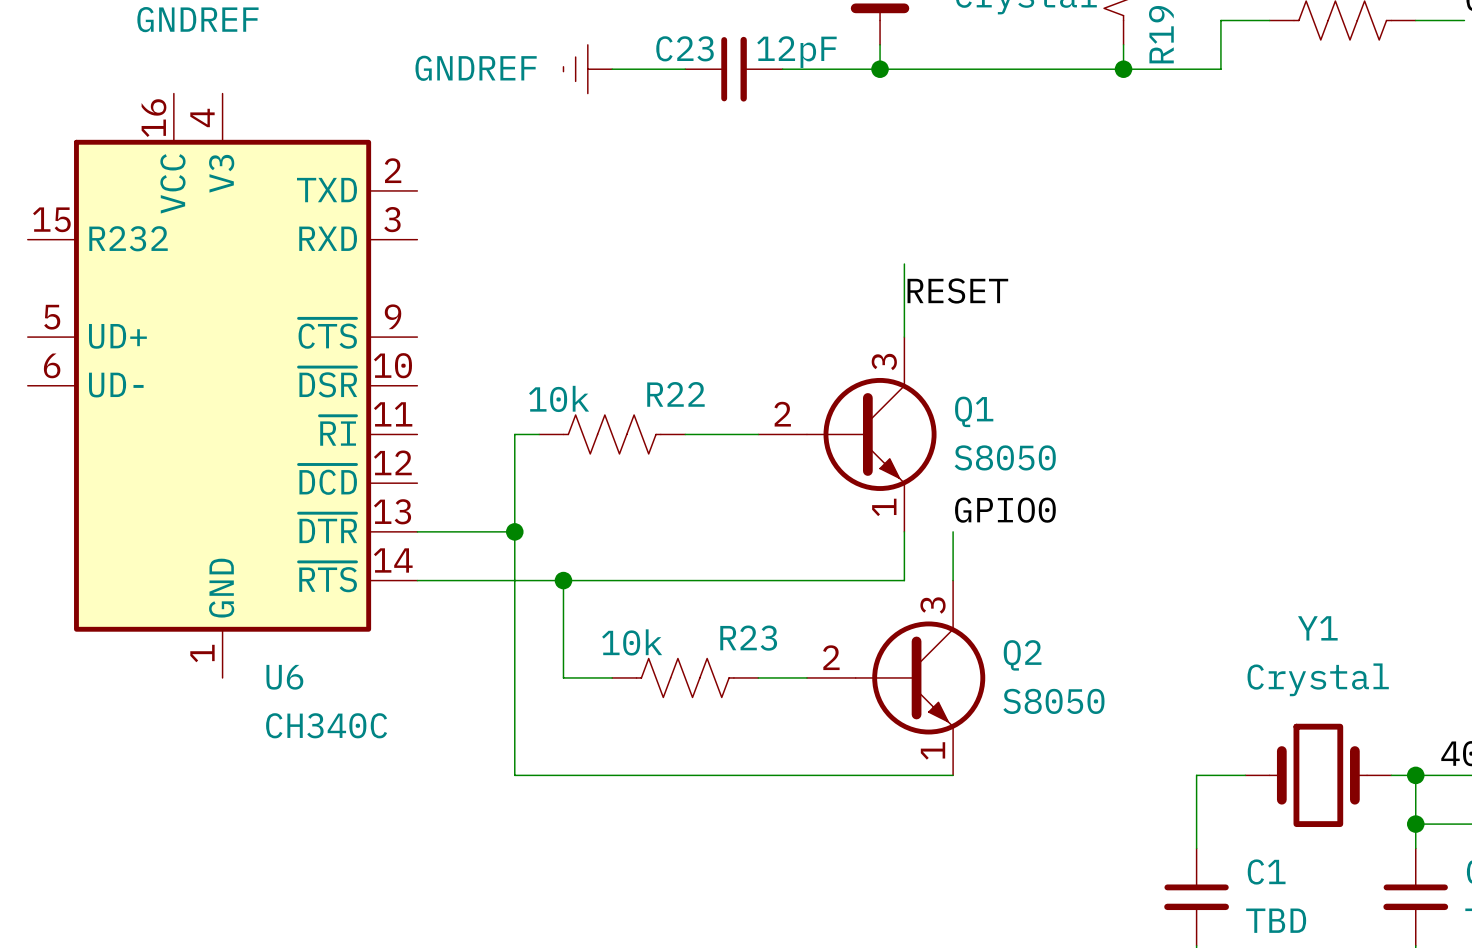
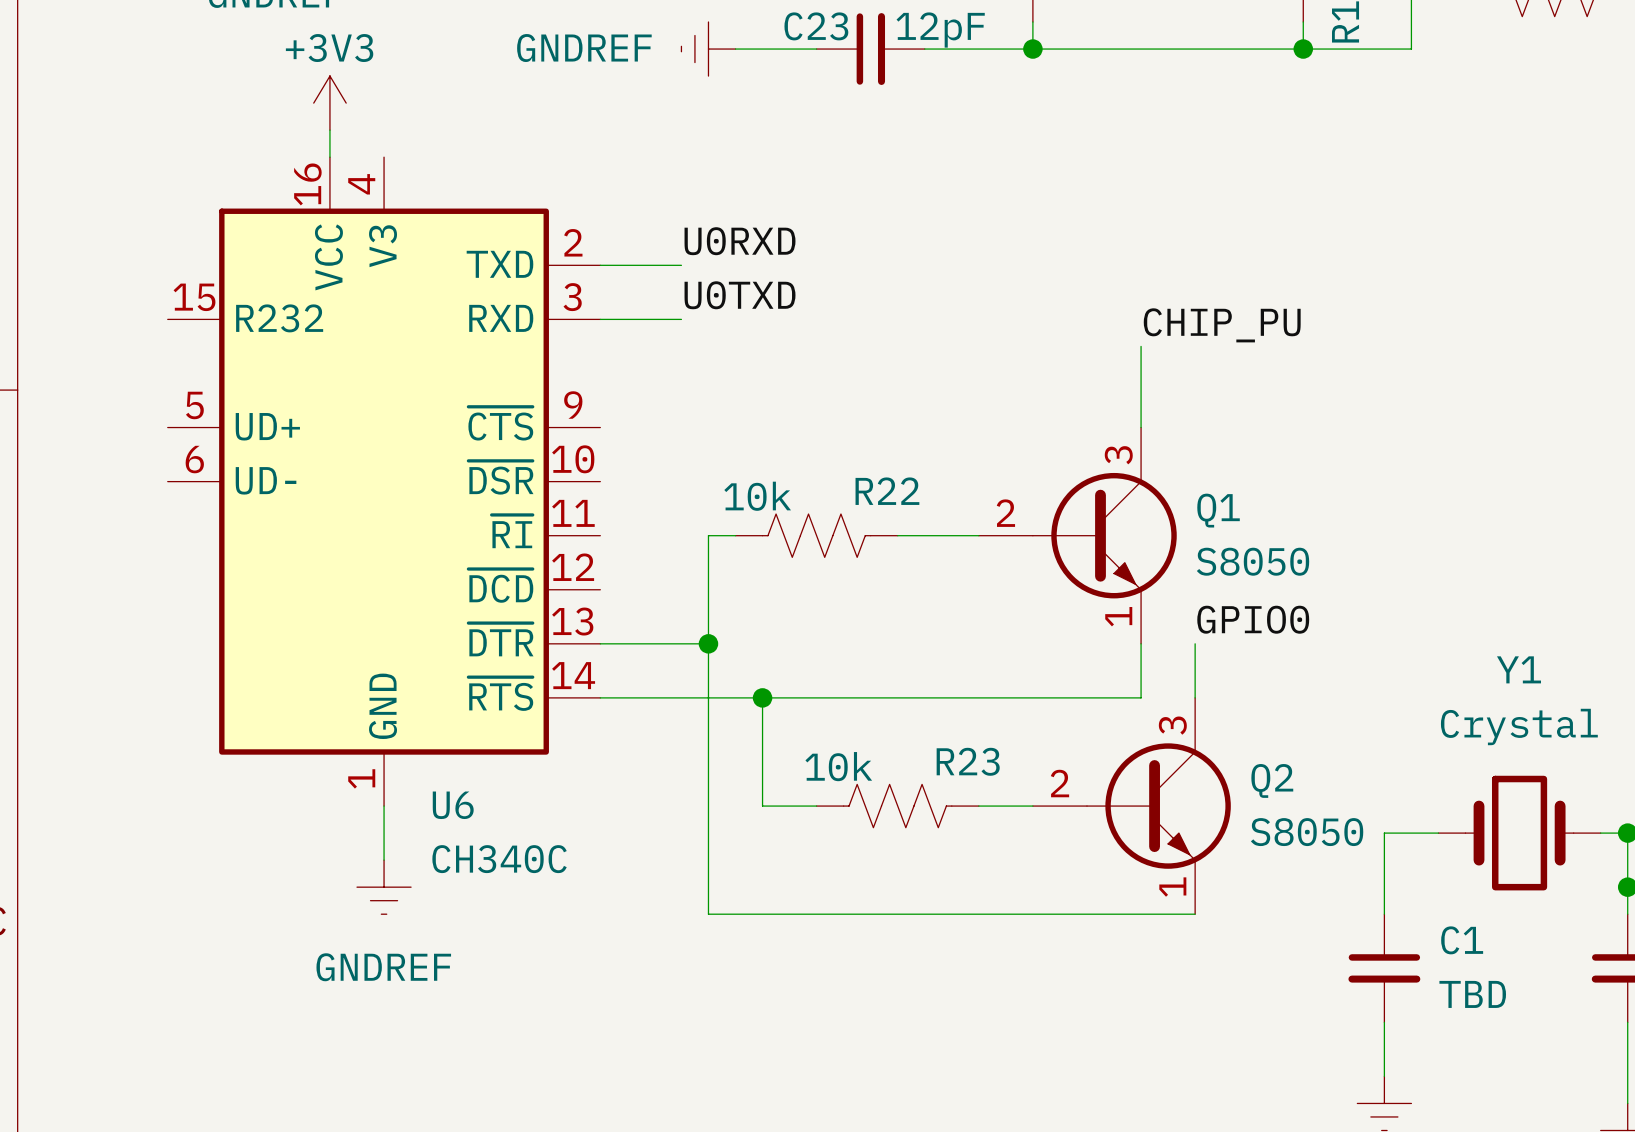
power symbol: none -> +3V3 (329, 103)
label: none -> U0RXD (740, 241)
wire: none -> (600, 265) (681, 265)
wire: (904, 264) (904, 337) -> (1141, 346) (1141, 427)
label: none -> U0TXD (740, 295)
label: RESET (957, 290) -> none
wire: none -> (600, 319) (681, 319)
label: none -> CHIP_PU (1222, 325)
U6 position: (222, 385) -> (384, 481)
wire: (539, 434) (514, 434) (514, 775) (953, 775) -> (735, 535) (708, 535) (708, 914) (1195, 914)
R22 position: (612, 434) -> (816, 535)
wire: (685, 434) (758, 434) -> (897, 535) (978, 535)
Q1 position: (847, 434) -> (1077, 535)
label position: GPIO0 (1005, 510) -> GPIO0 (1253, 619)
wire: (417, 531) (514, 531) -> (600, 643) (708, 643)
junction: (514, 531) -> none
wire: (904, 531) (904, 580) (417, 580) -> (1141, 643) (1141, 697) (600, 697)
wire: (953, 531) (953, 580) -> (1195, 643) (1195, 697)
wire: (563, 580) (563, 677) (612, 677) -> (762, 697) (762, 806) (816, 806)
junction position: (563, 580) -> (708, 643)
junction: none -> (762, 697)
R23 position: (685, 677) -> (897, 806)
wire: (758, 677) (806, 677) -> (978, 806) (1032, 806)
Q2 position: (896, 677) -> (1131, 806)
wire: none -> (384, 806) (384, 860)
power symbol: none -> GNDREF (384, 887)

